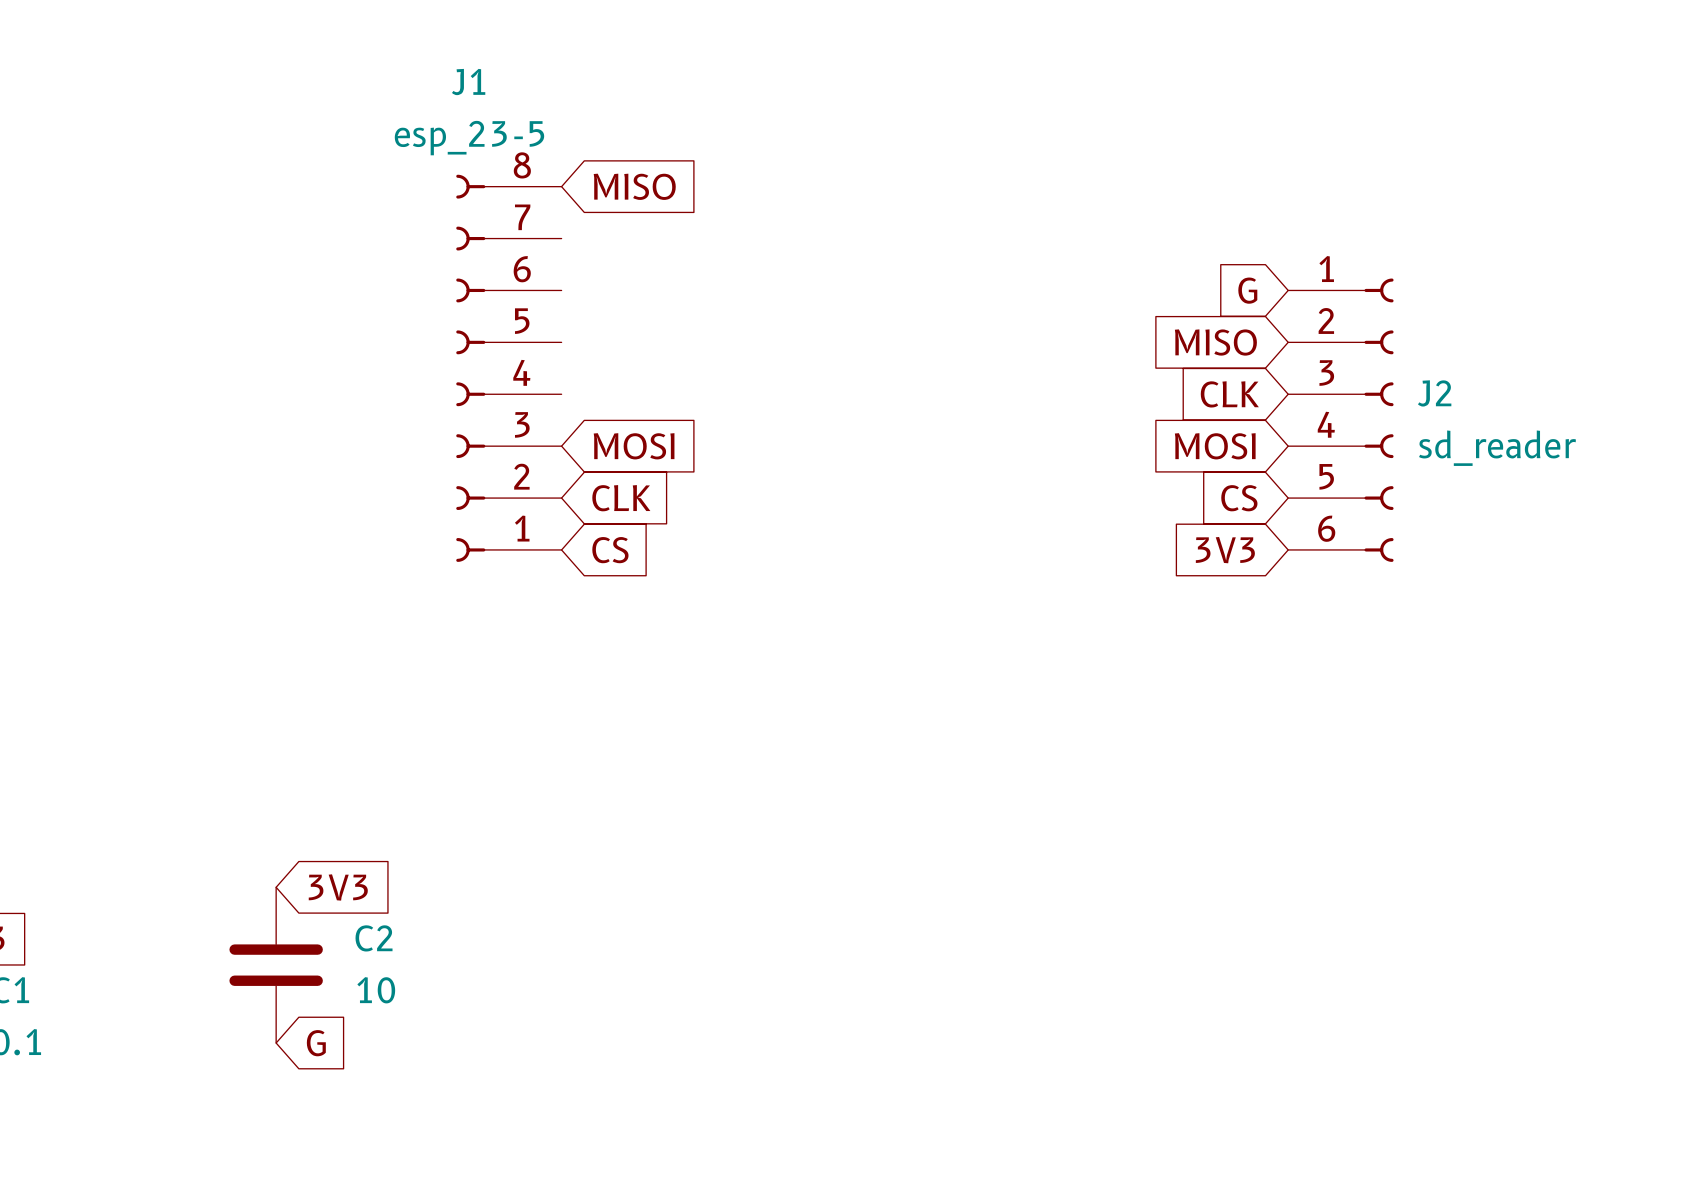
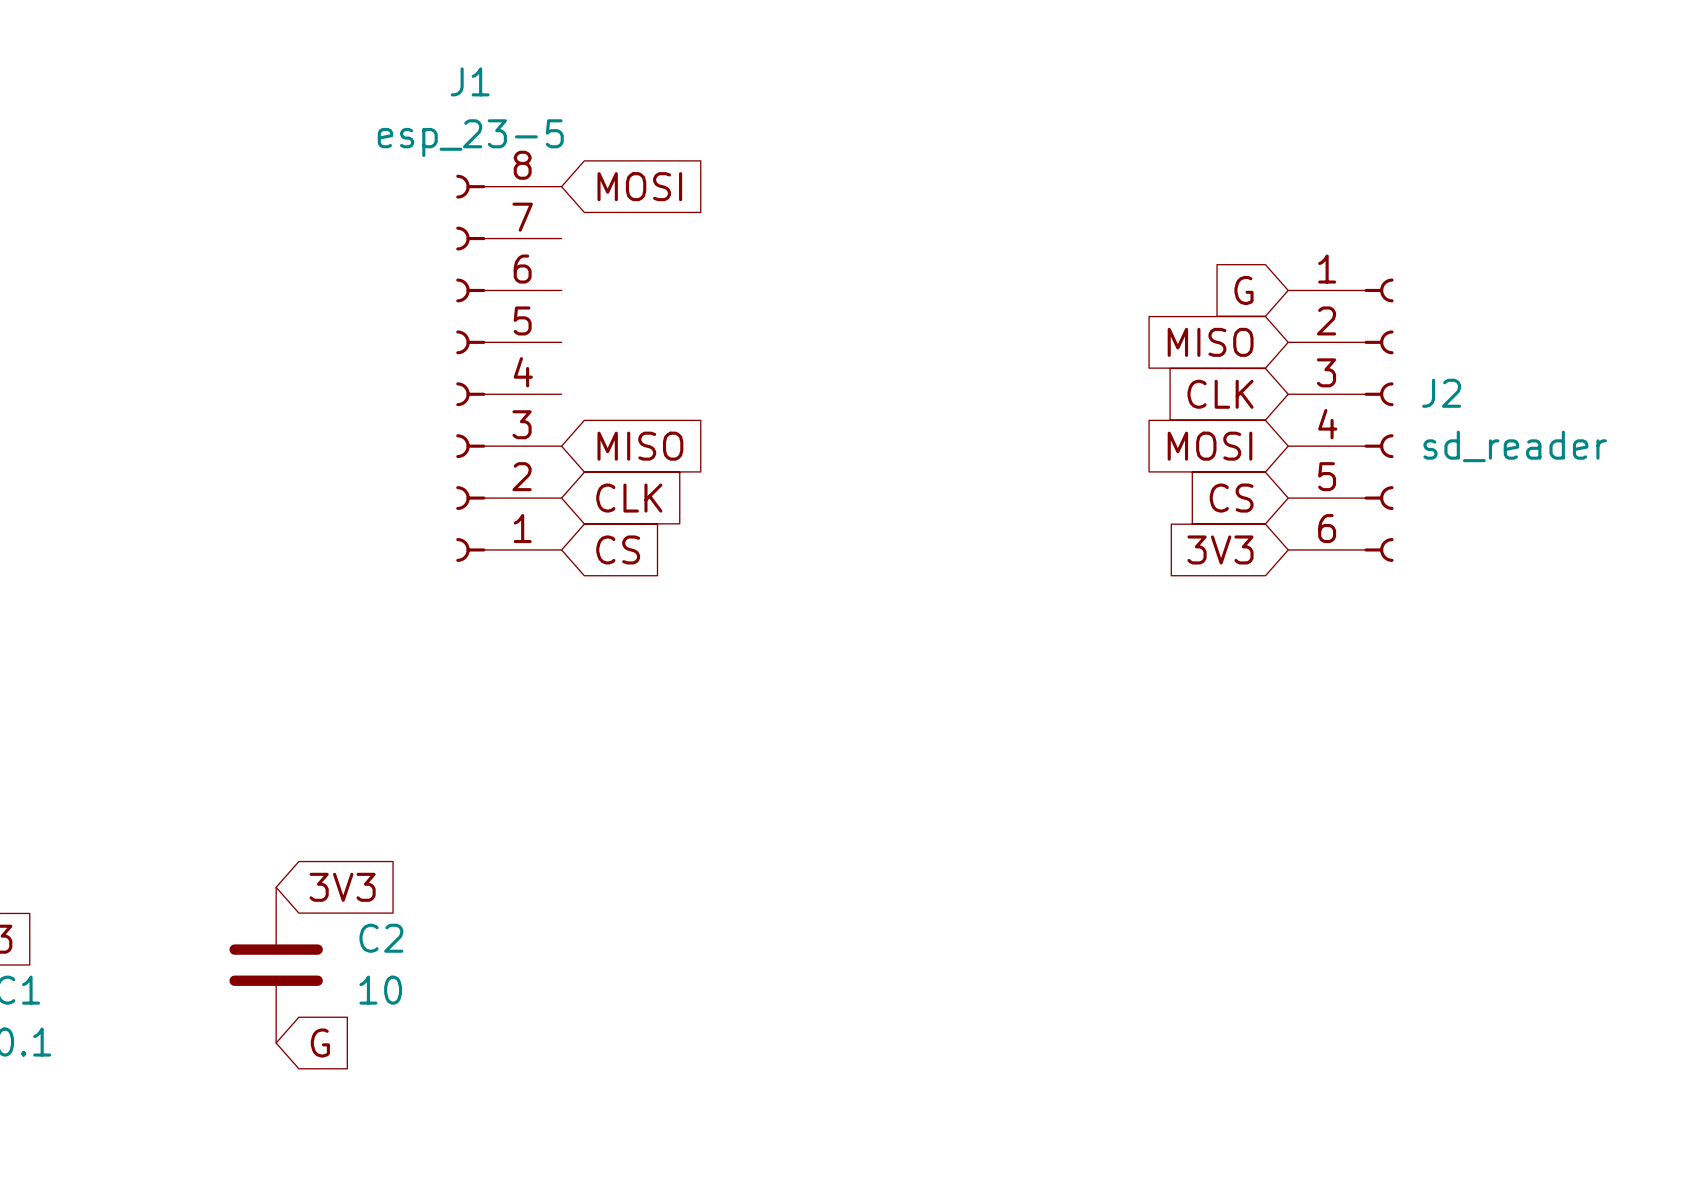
global label: MISO (634, 186) -> MOSI (639, 186)
global label: MOSI (634, 446) -> MISO (640, 446)

